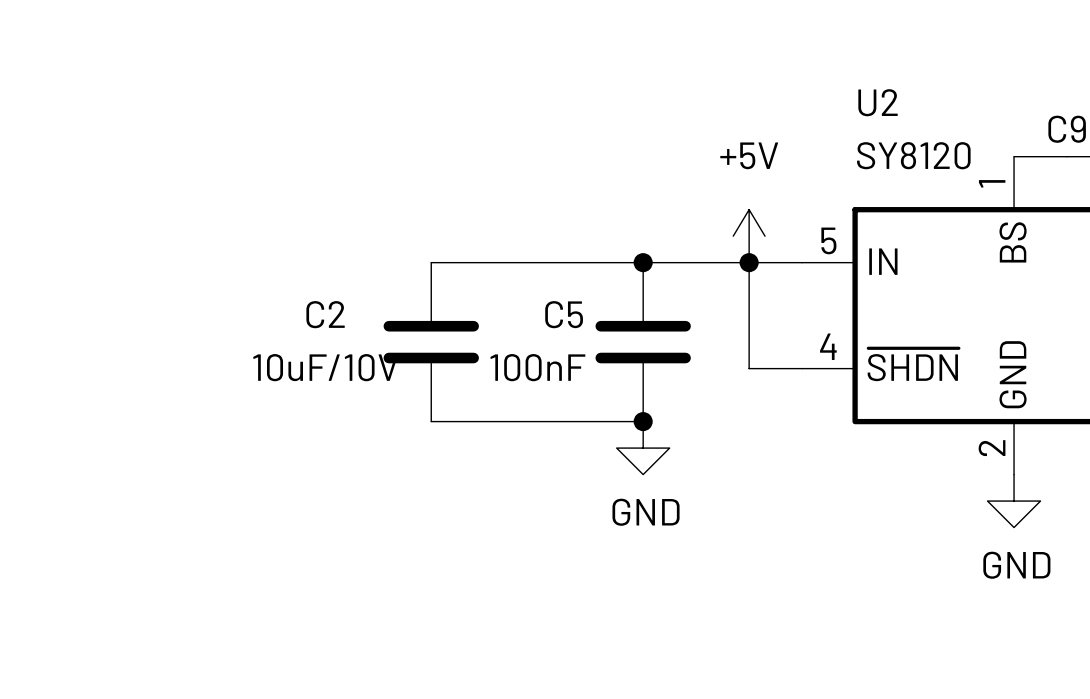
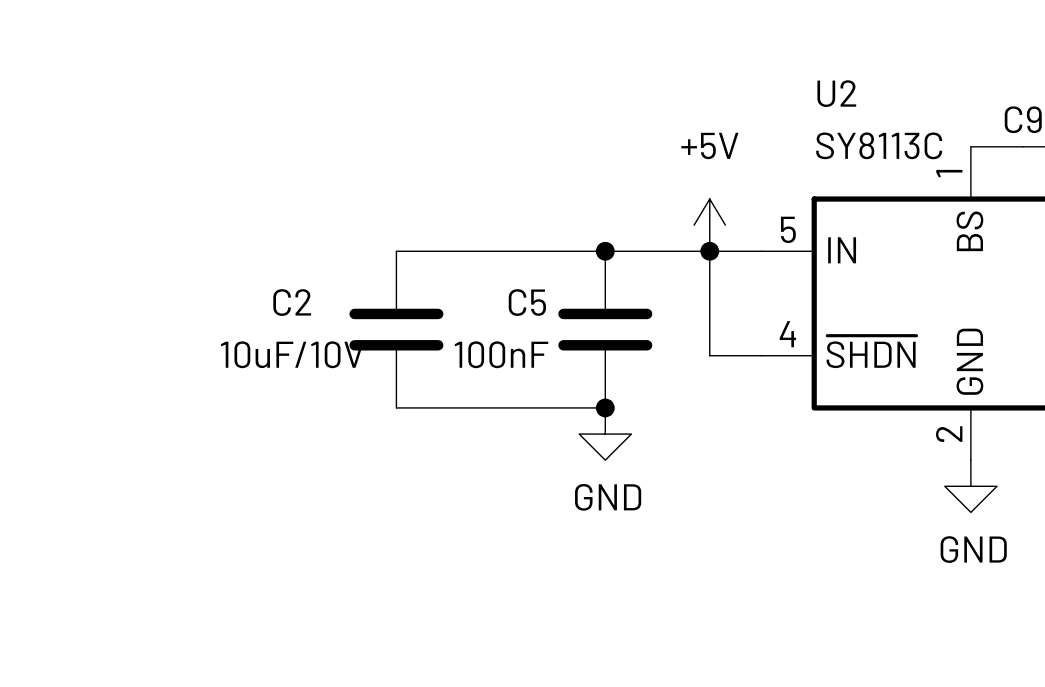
U2 value: SY8120 (913, 155) -> SY8113C (879, 145)

